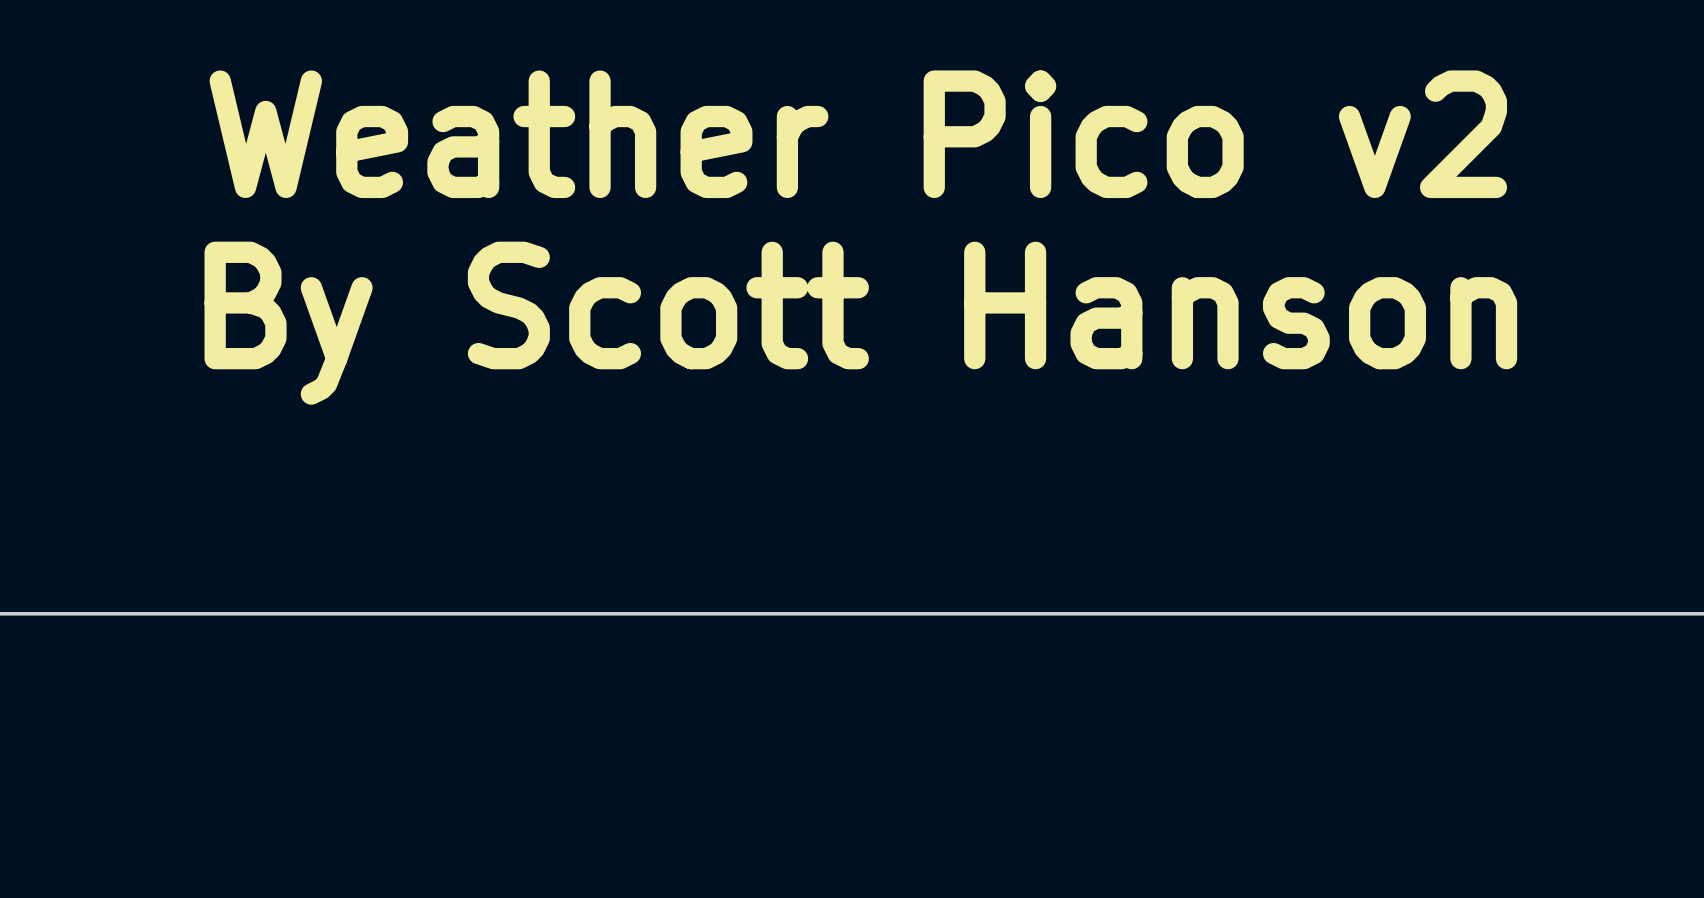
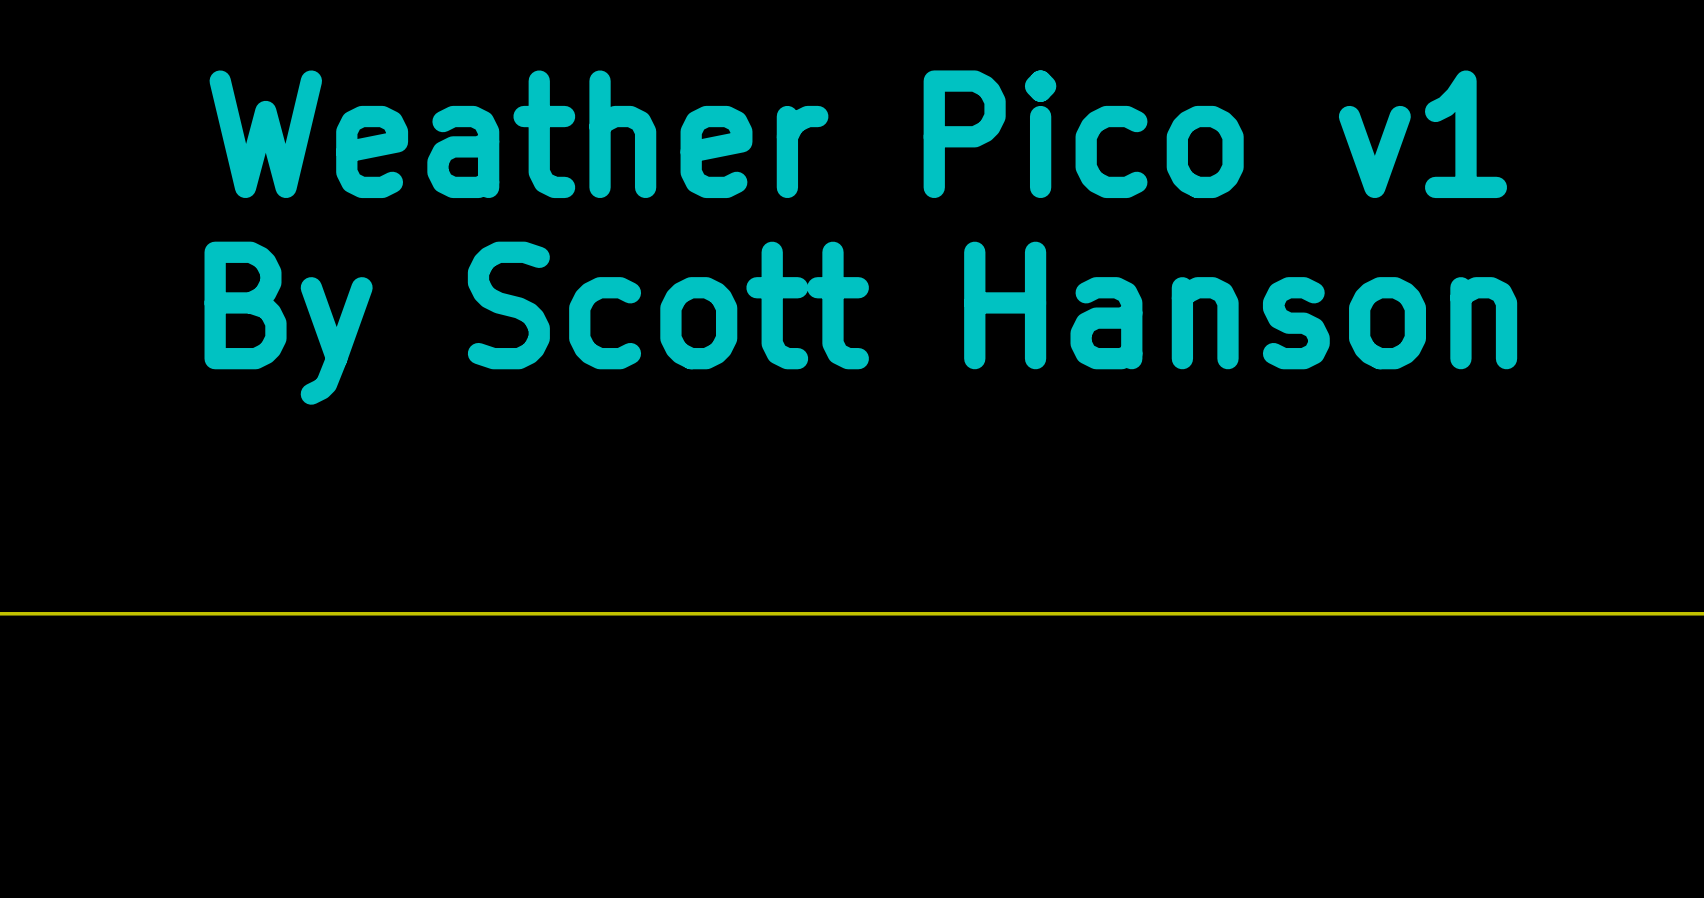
text: Weather Pico v2 (858, 134) -> Weather Pico v1 (858, 134)

